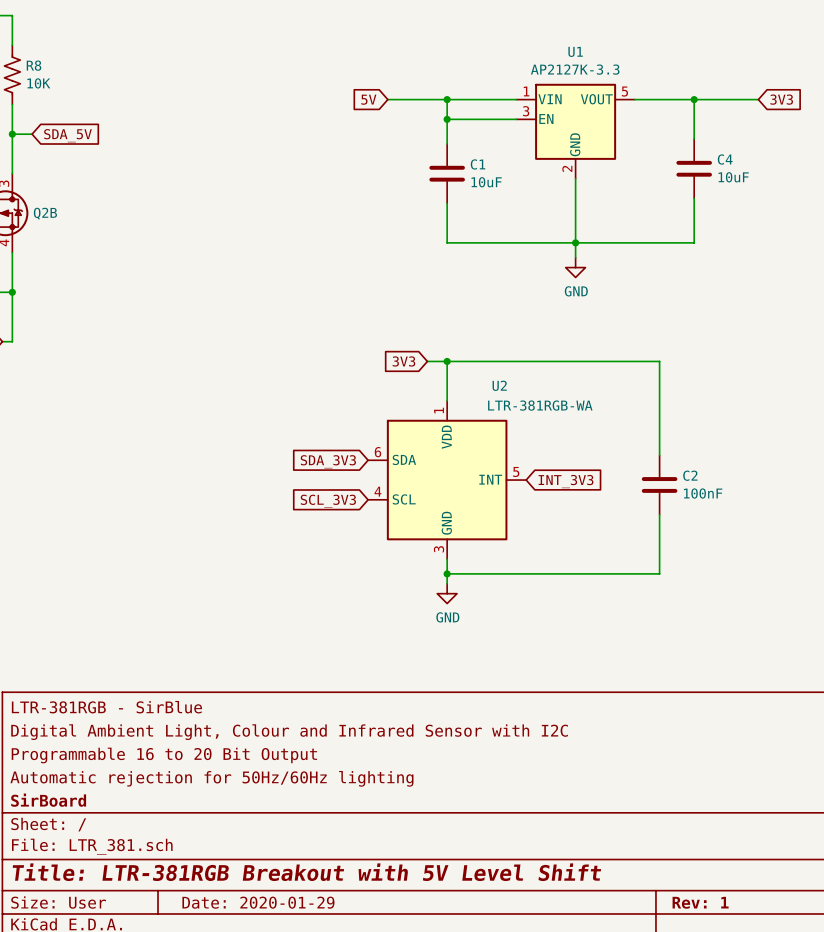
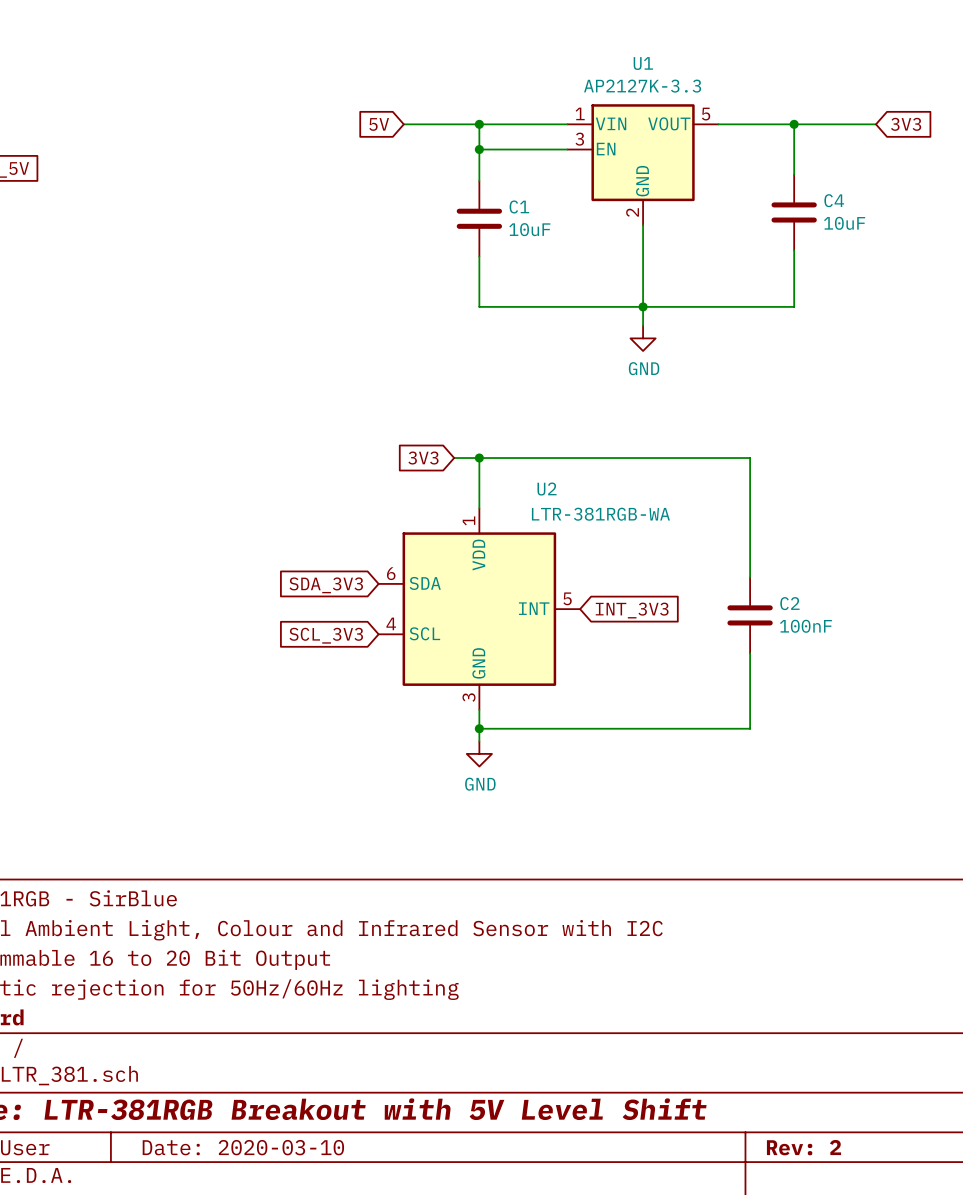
title block: Date: 2020-01-29 (258, 902) -> Date: 2020-03-10 (243, 1147)
title block: Rev: 1 (700, 902) -> Rev: 2 (803, 1147)

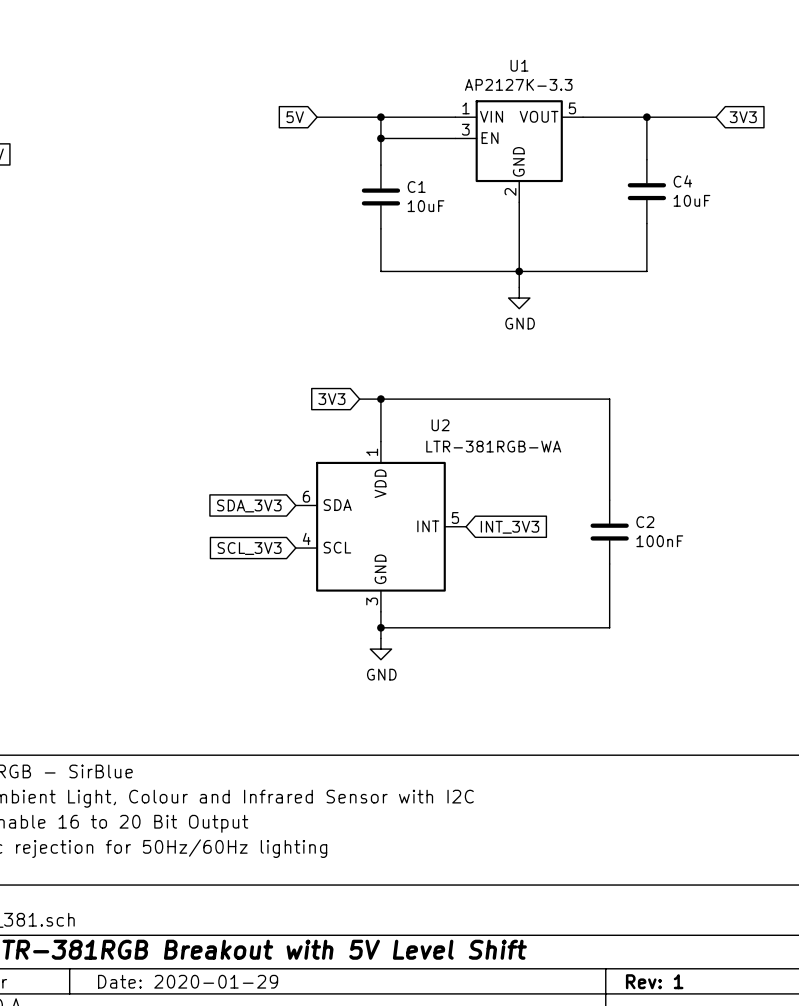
title block: Date: 2020-03-10 (243, 1147) -> Date: 2020-01-29 (188, 981)
title block: Rev: 2 (803, 1147) -> Rev: 1 (654, 981)

